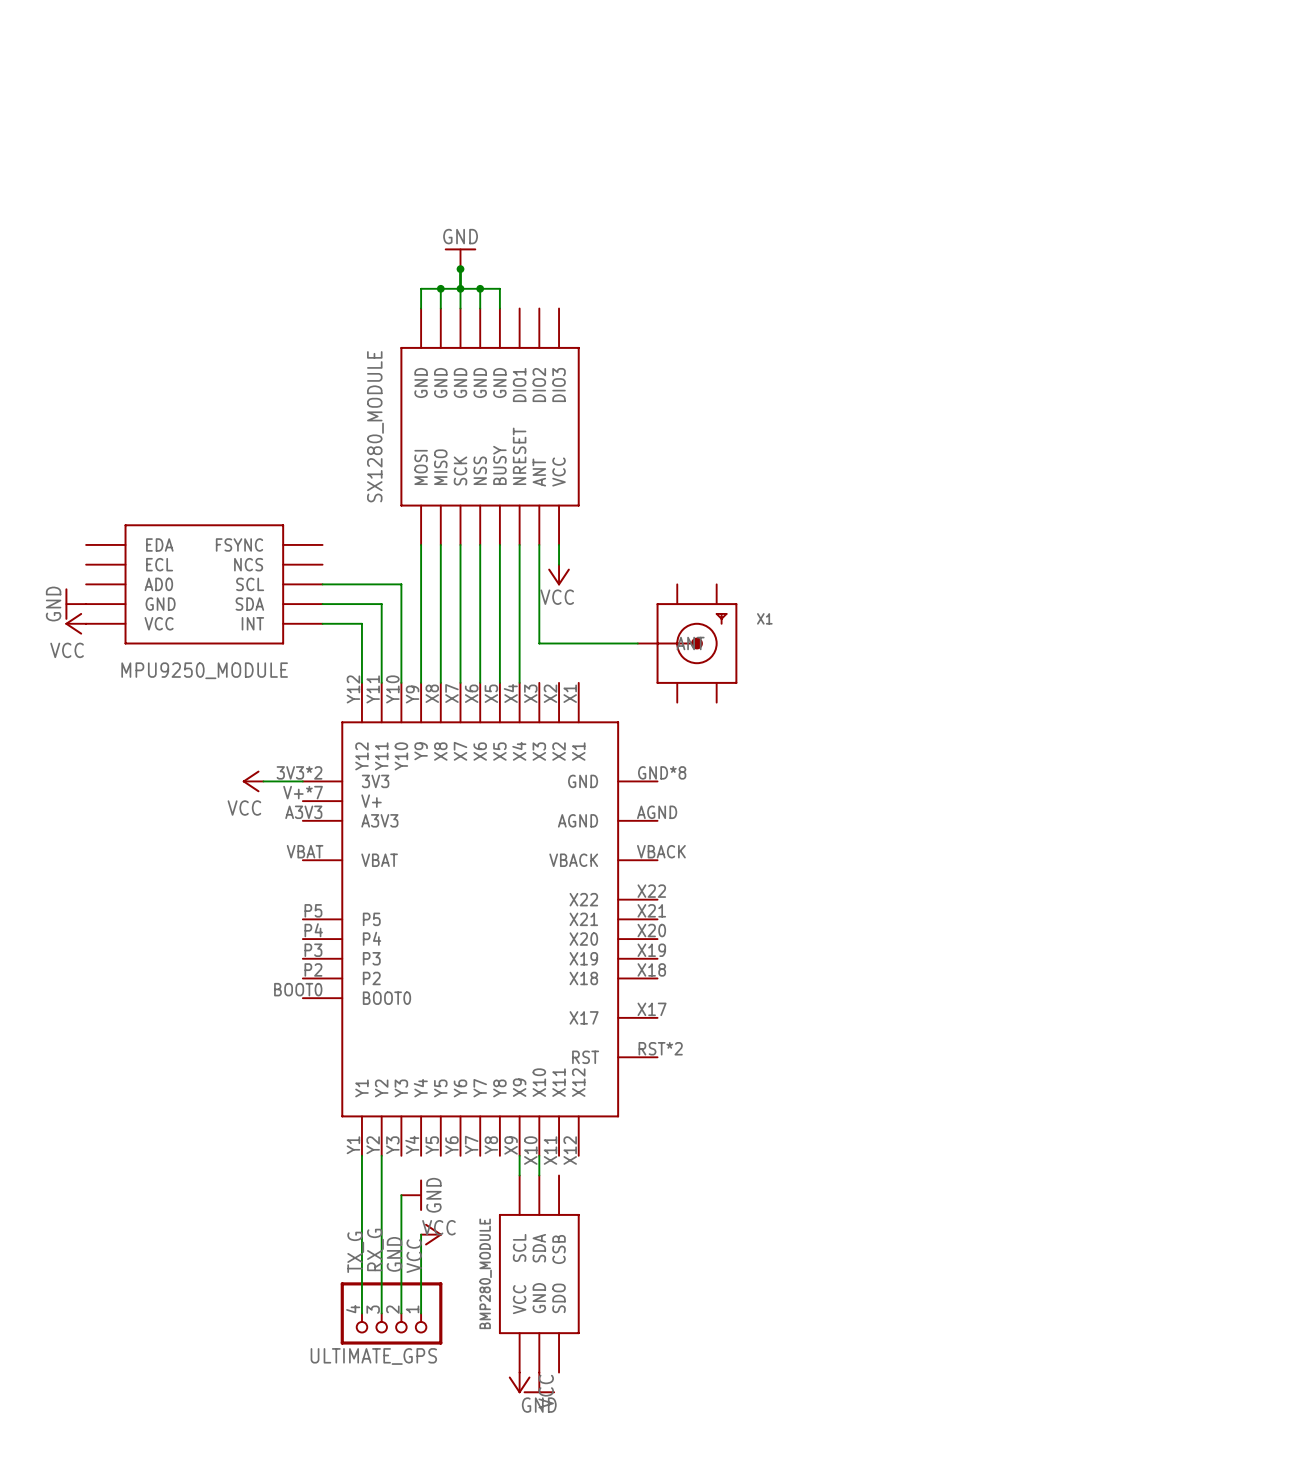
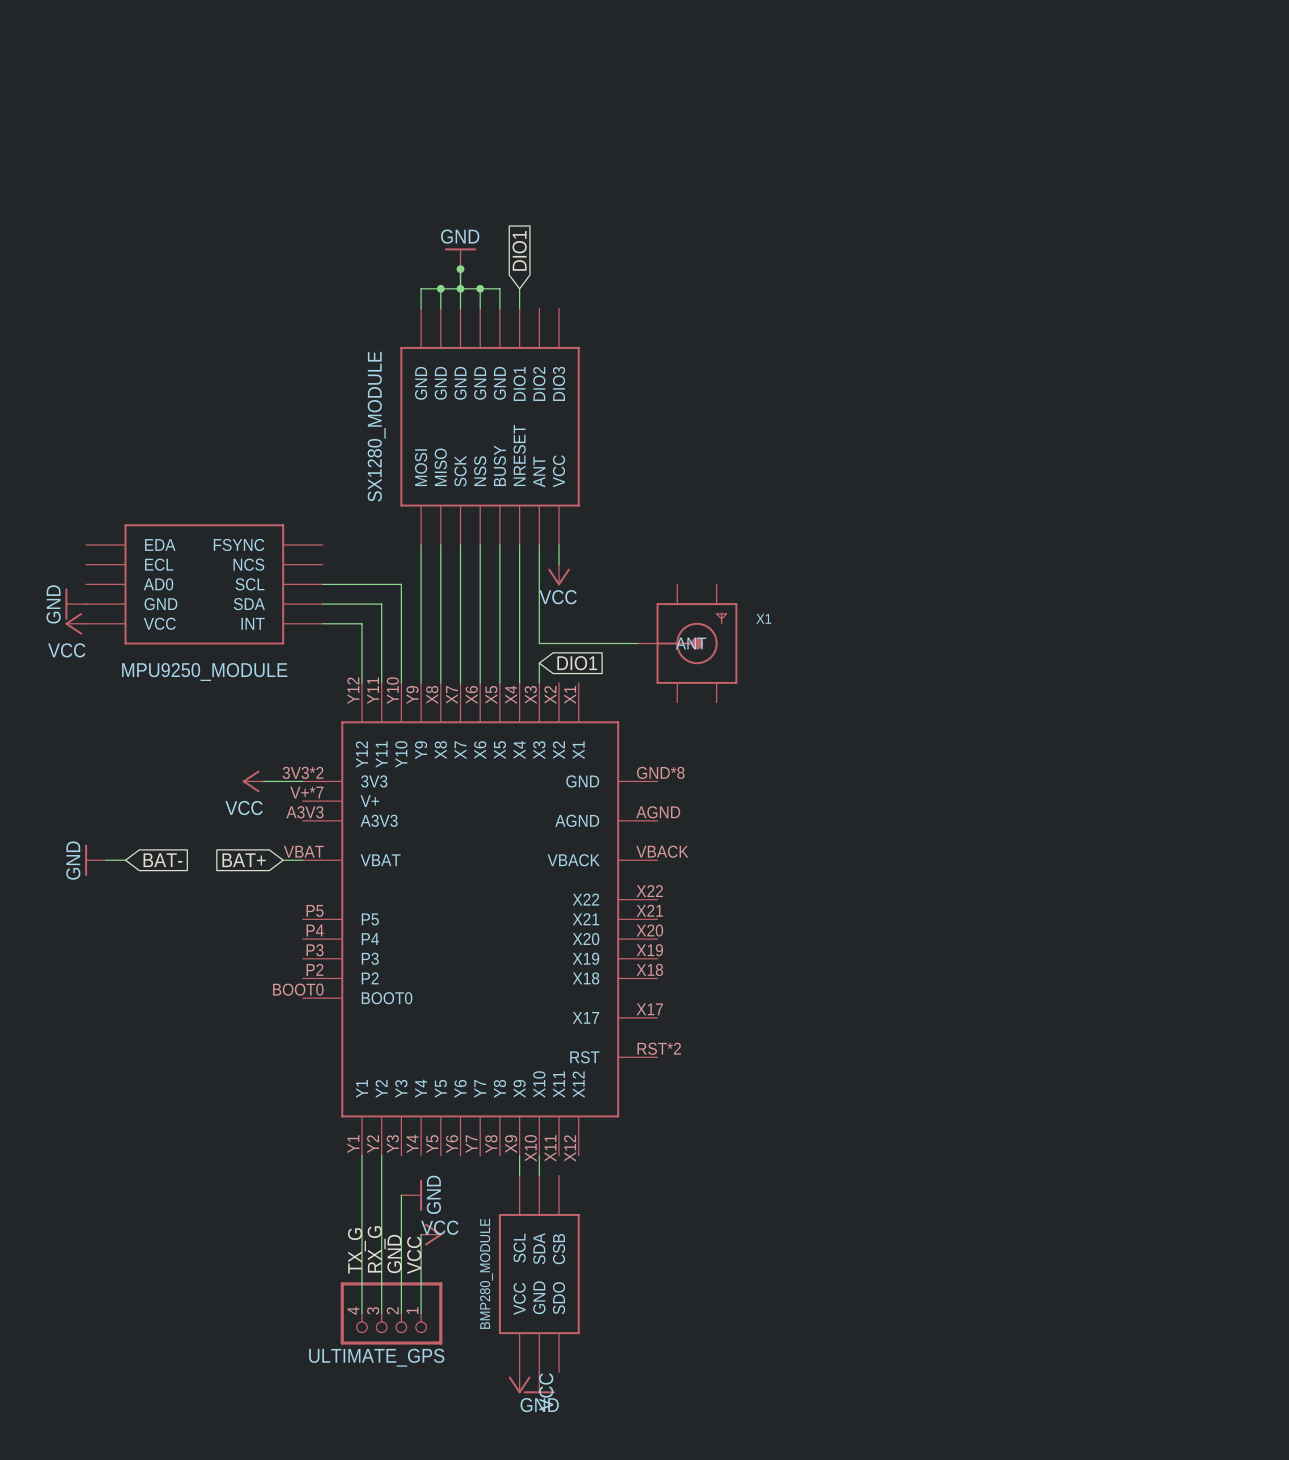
global label: none -> DIO1 (519, 250)
wire: none -> (519, 288) (519, 308)
wire: none -> (539, 663) (539, 682)
global label: none -> DIO1 (577, 663)
power symbol: none -> GND (95, 860)
wire: none -> (105, 860) (125, 860)
global label: none -> BAT- (162, 860)
global label: none -> BAT+ (244, 860)
wire: none -> (283, 860) (302, 860)

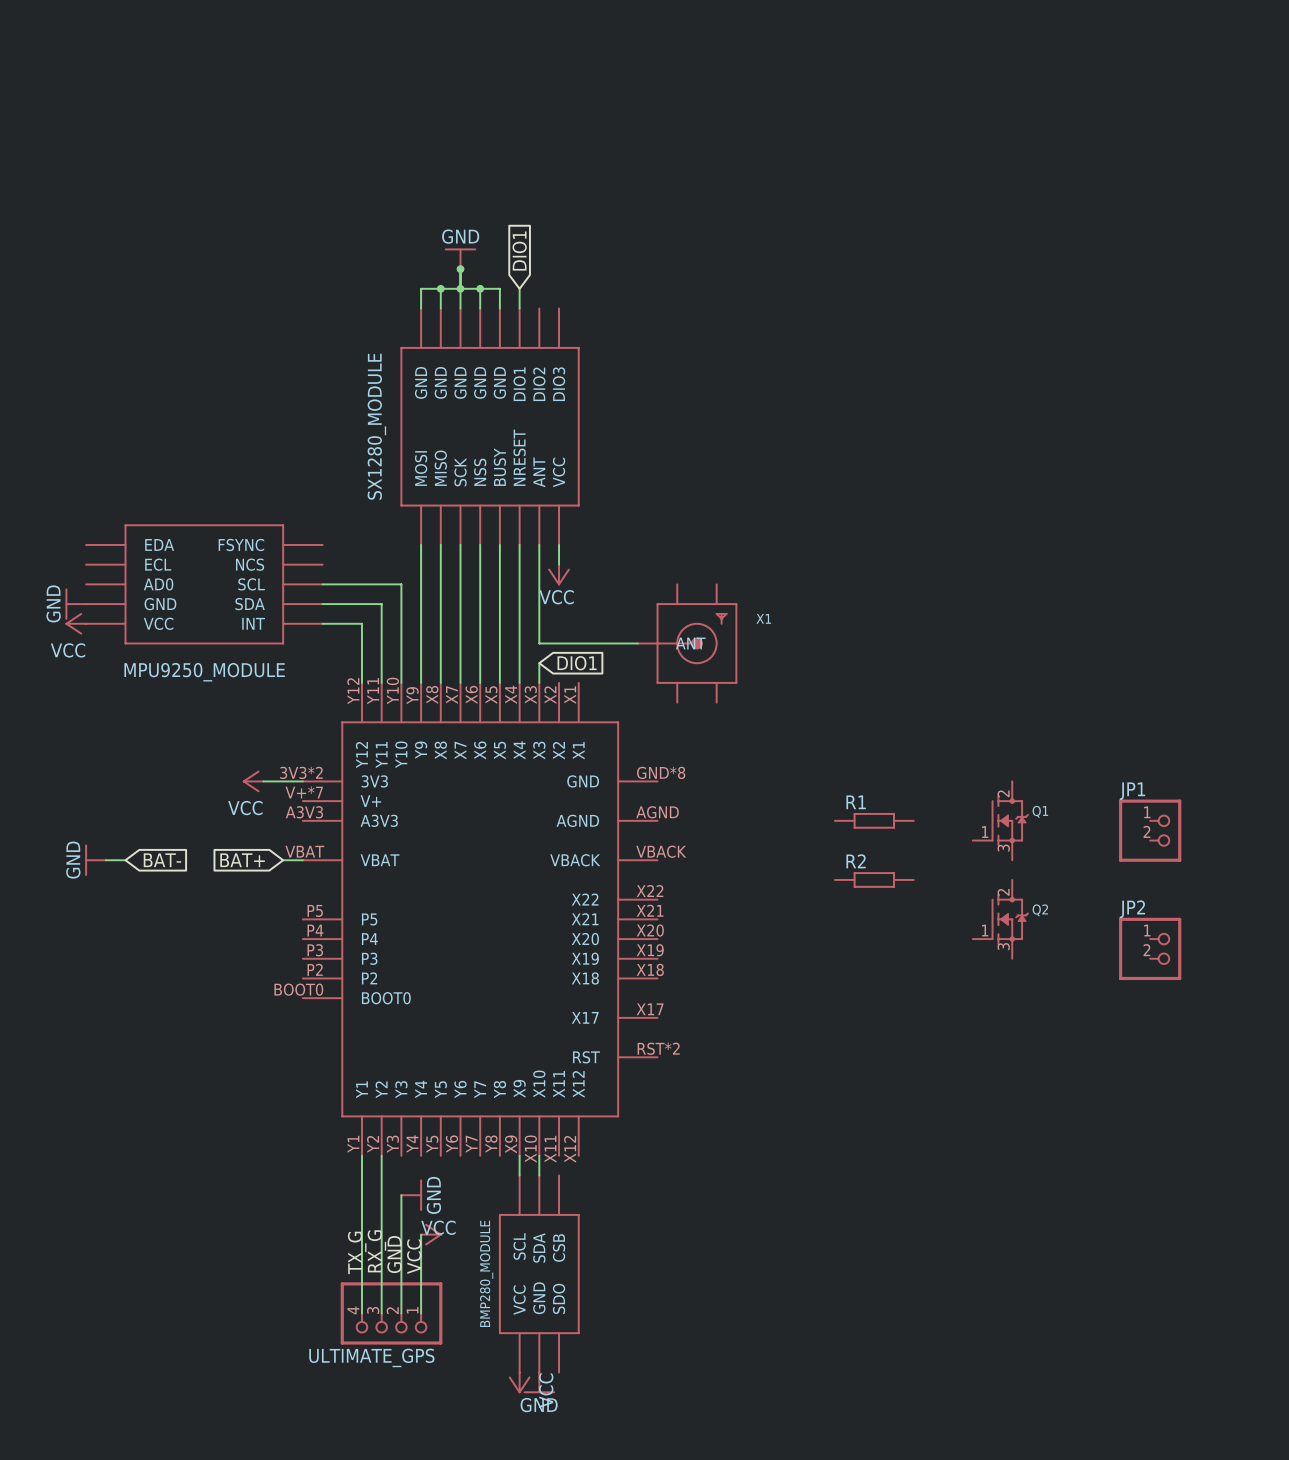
R1: none -> (874, 820)
Q1: none -> (1000, 820)
JP1: none -> (1150, 830)
R2: none -> (874, 879)
Q2: none -> (1000, 919)
JP2: none -> (1150, 948)

